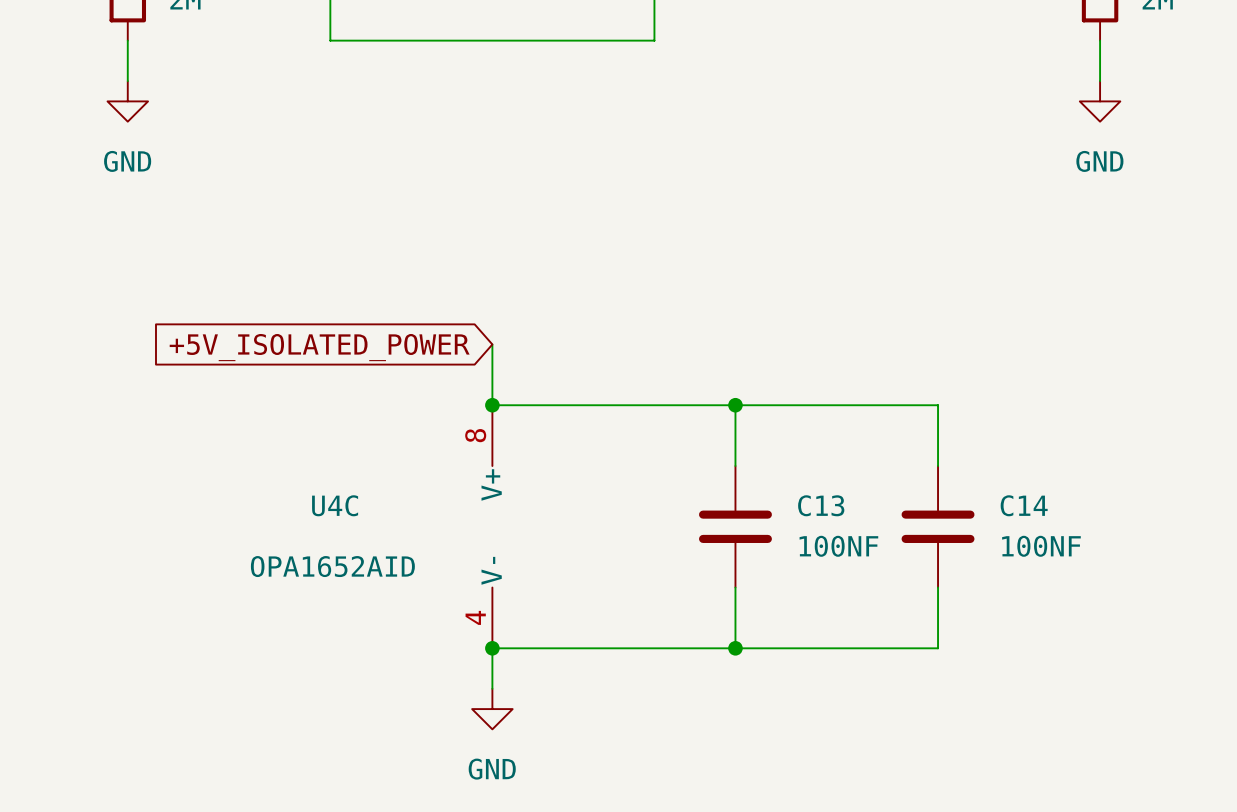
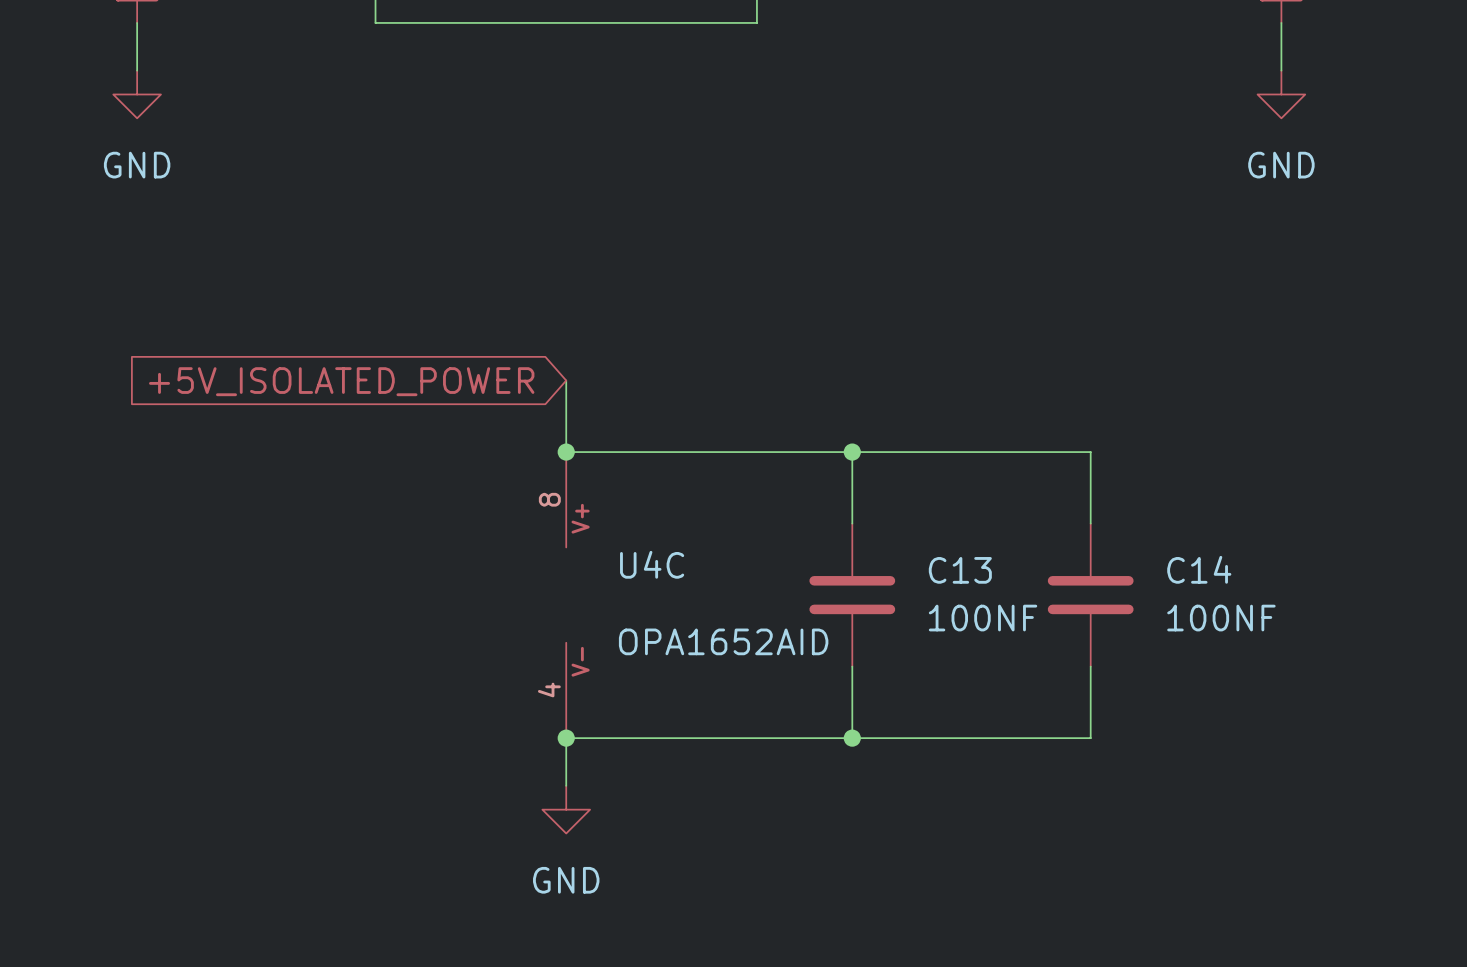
U4C symbol: [492, 405, 493, 649] -> [566, 452, 567, 739]
U4C name position: U4C (335, 505) -> U4C (652, 564)
U4C value position: OPA1652AID (332, 566) -> OPA1652AID (723, 641)

